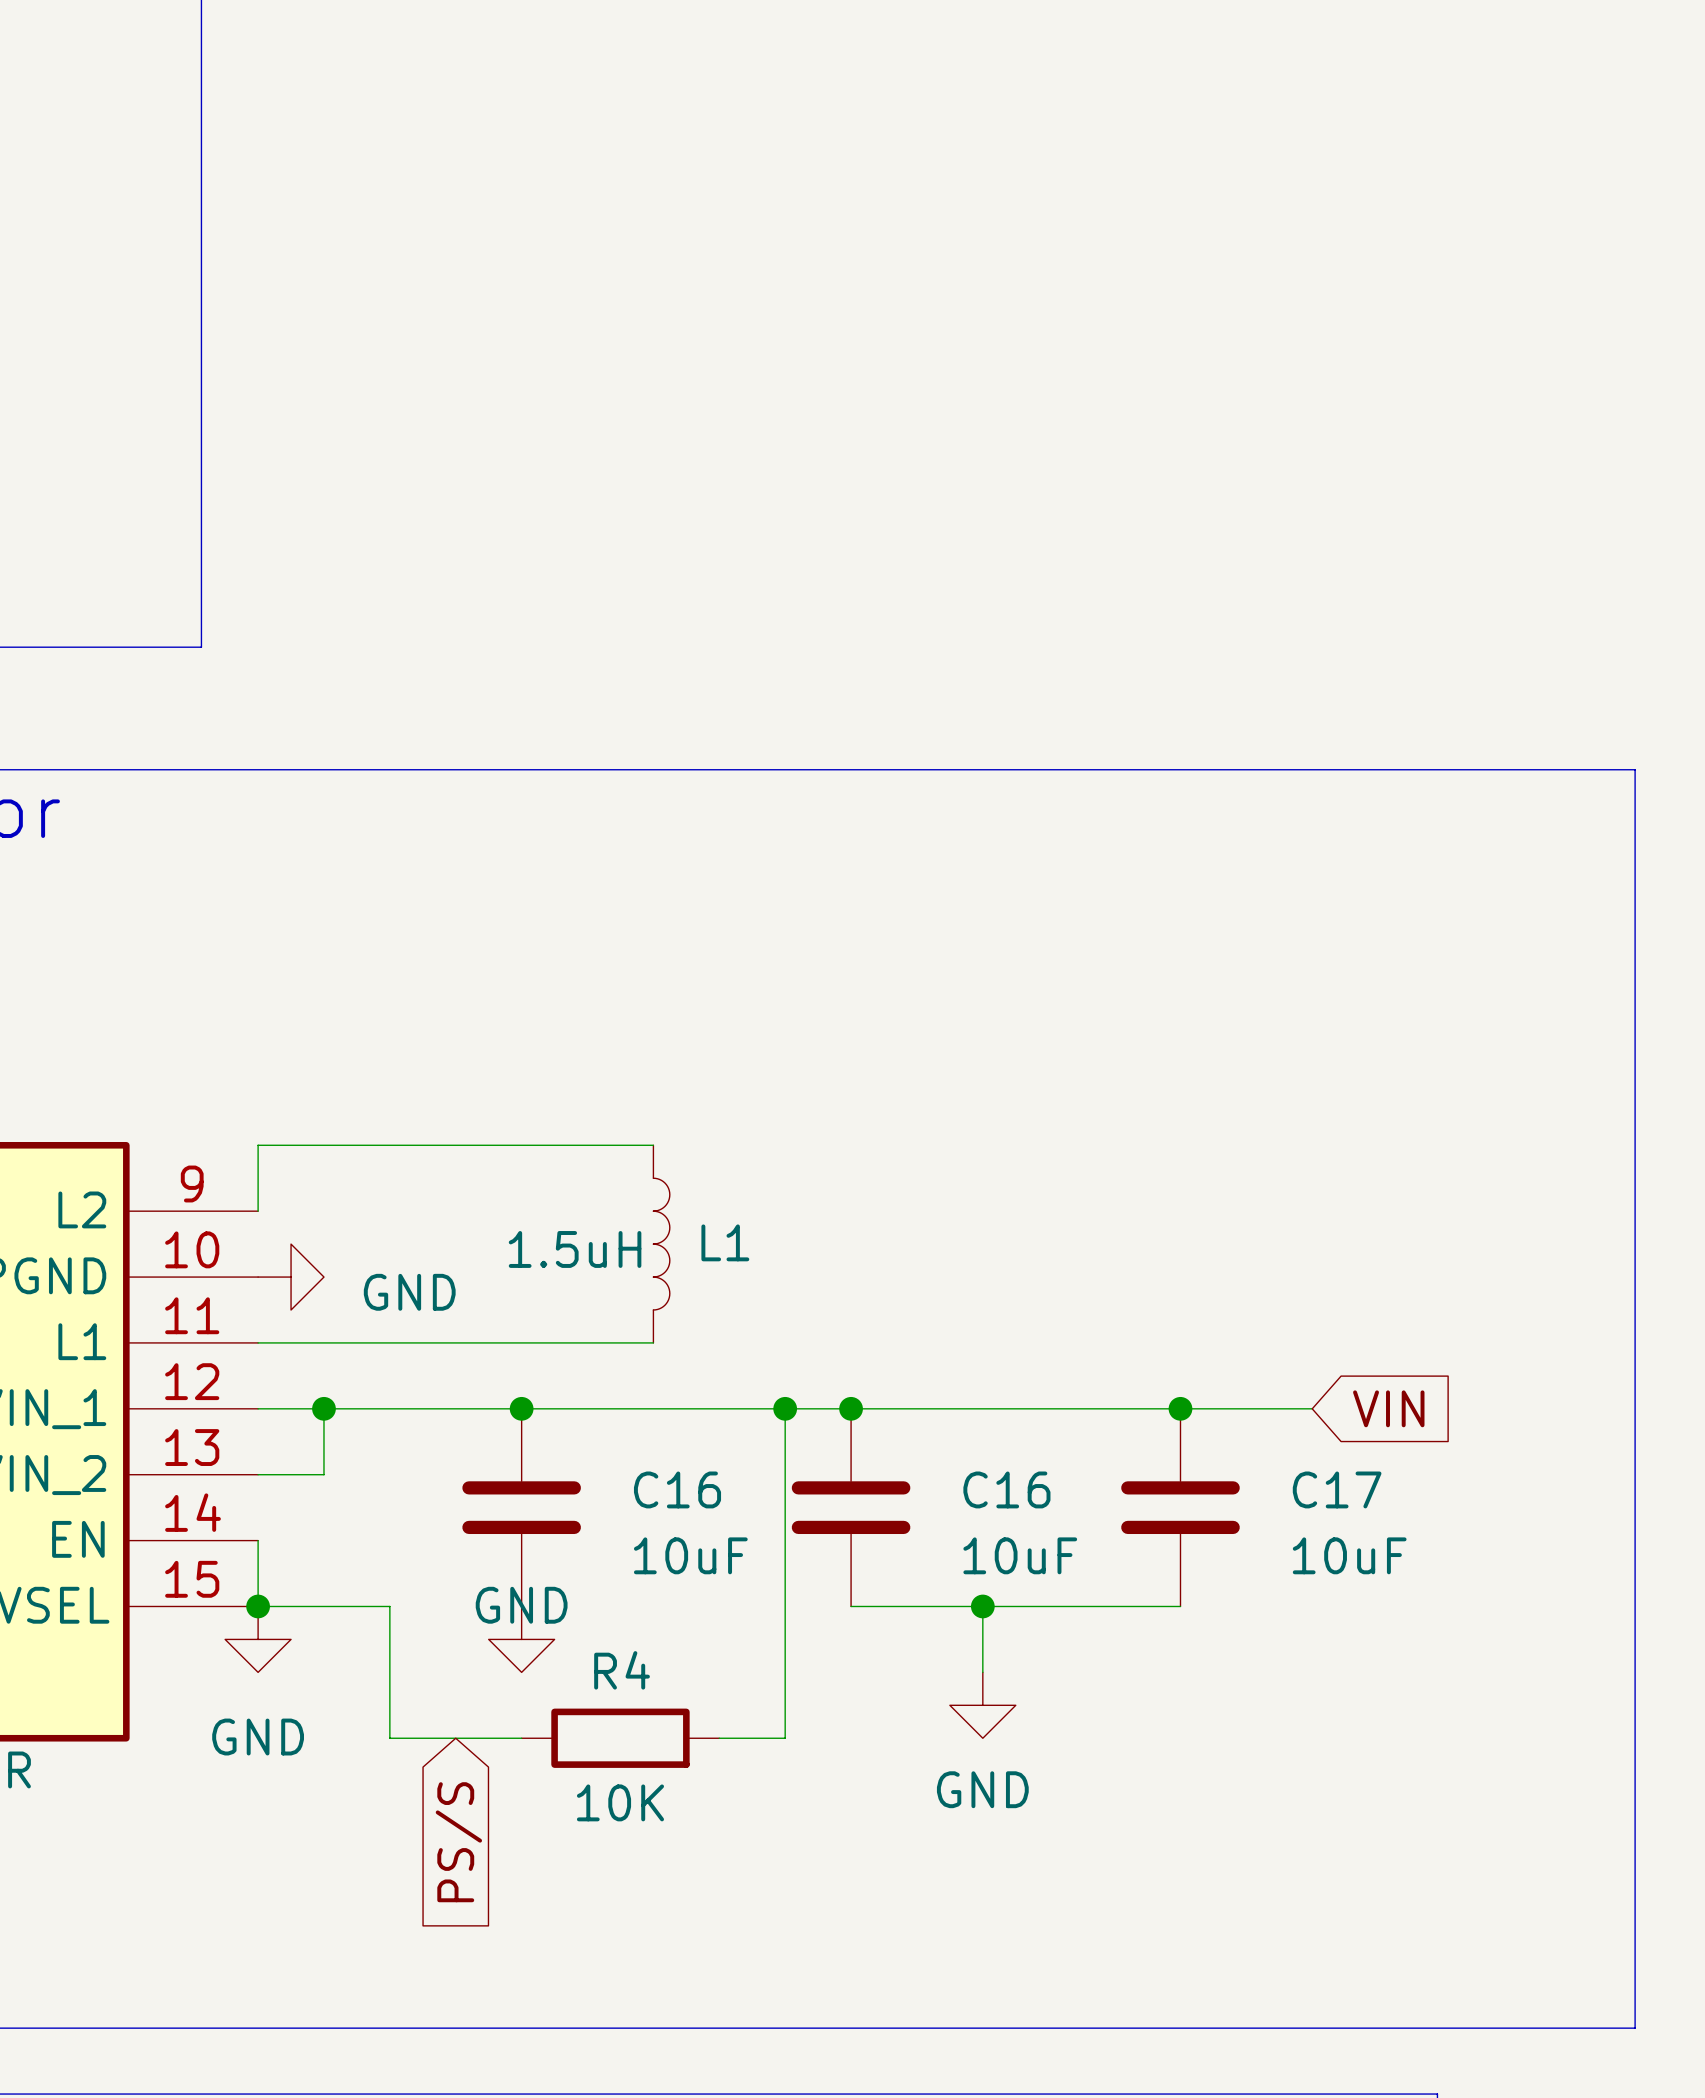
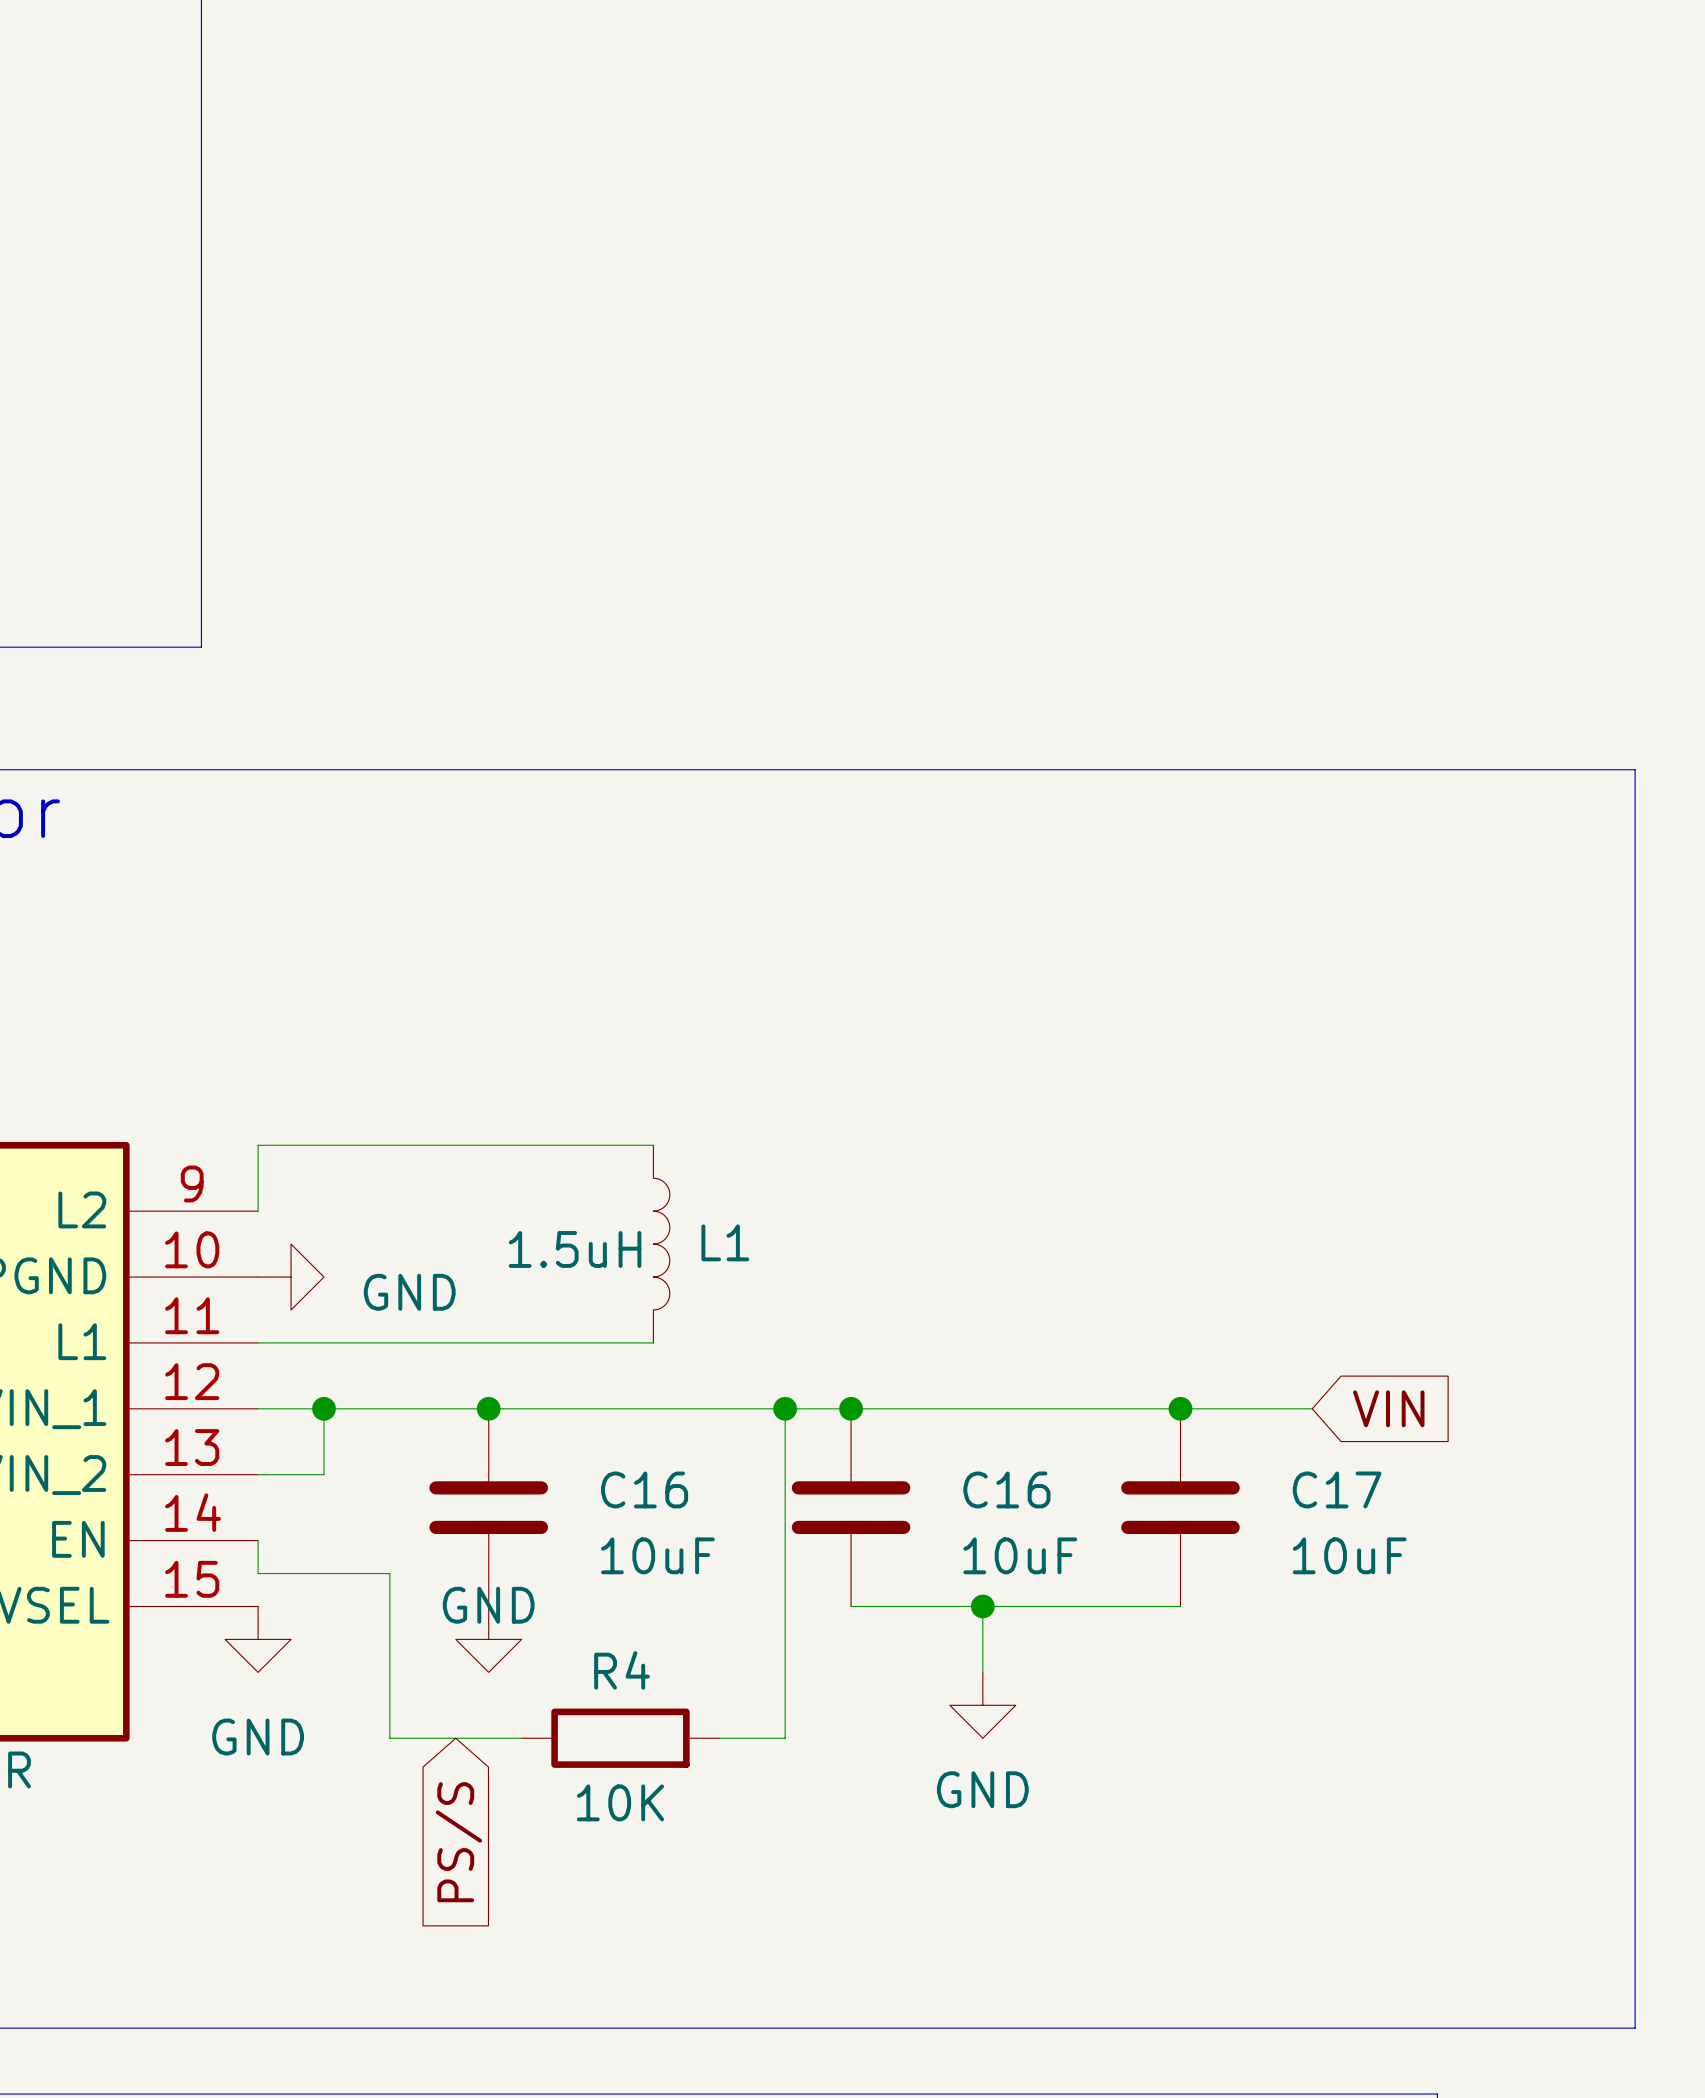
junction position: (521, 1408) -> (488, 1408)
C16 position: (521, 1507) -> (488, 1507)
wire: (258, 1573) (258, 1606) (389, 1606) -> (258, 1573) (389, 1573) (389, 1606)
junction: (258, 1606) -> none
power symbol position: GND (521, 1639) -> GND (488, 1639)

